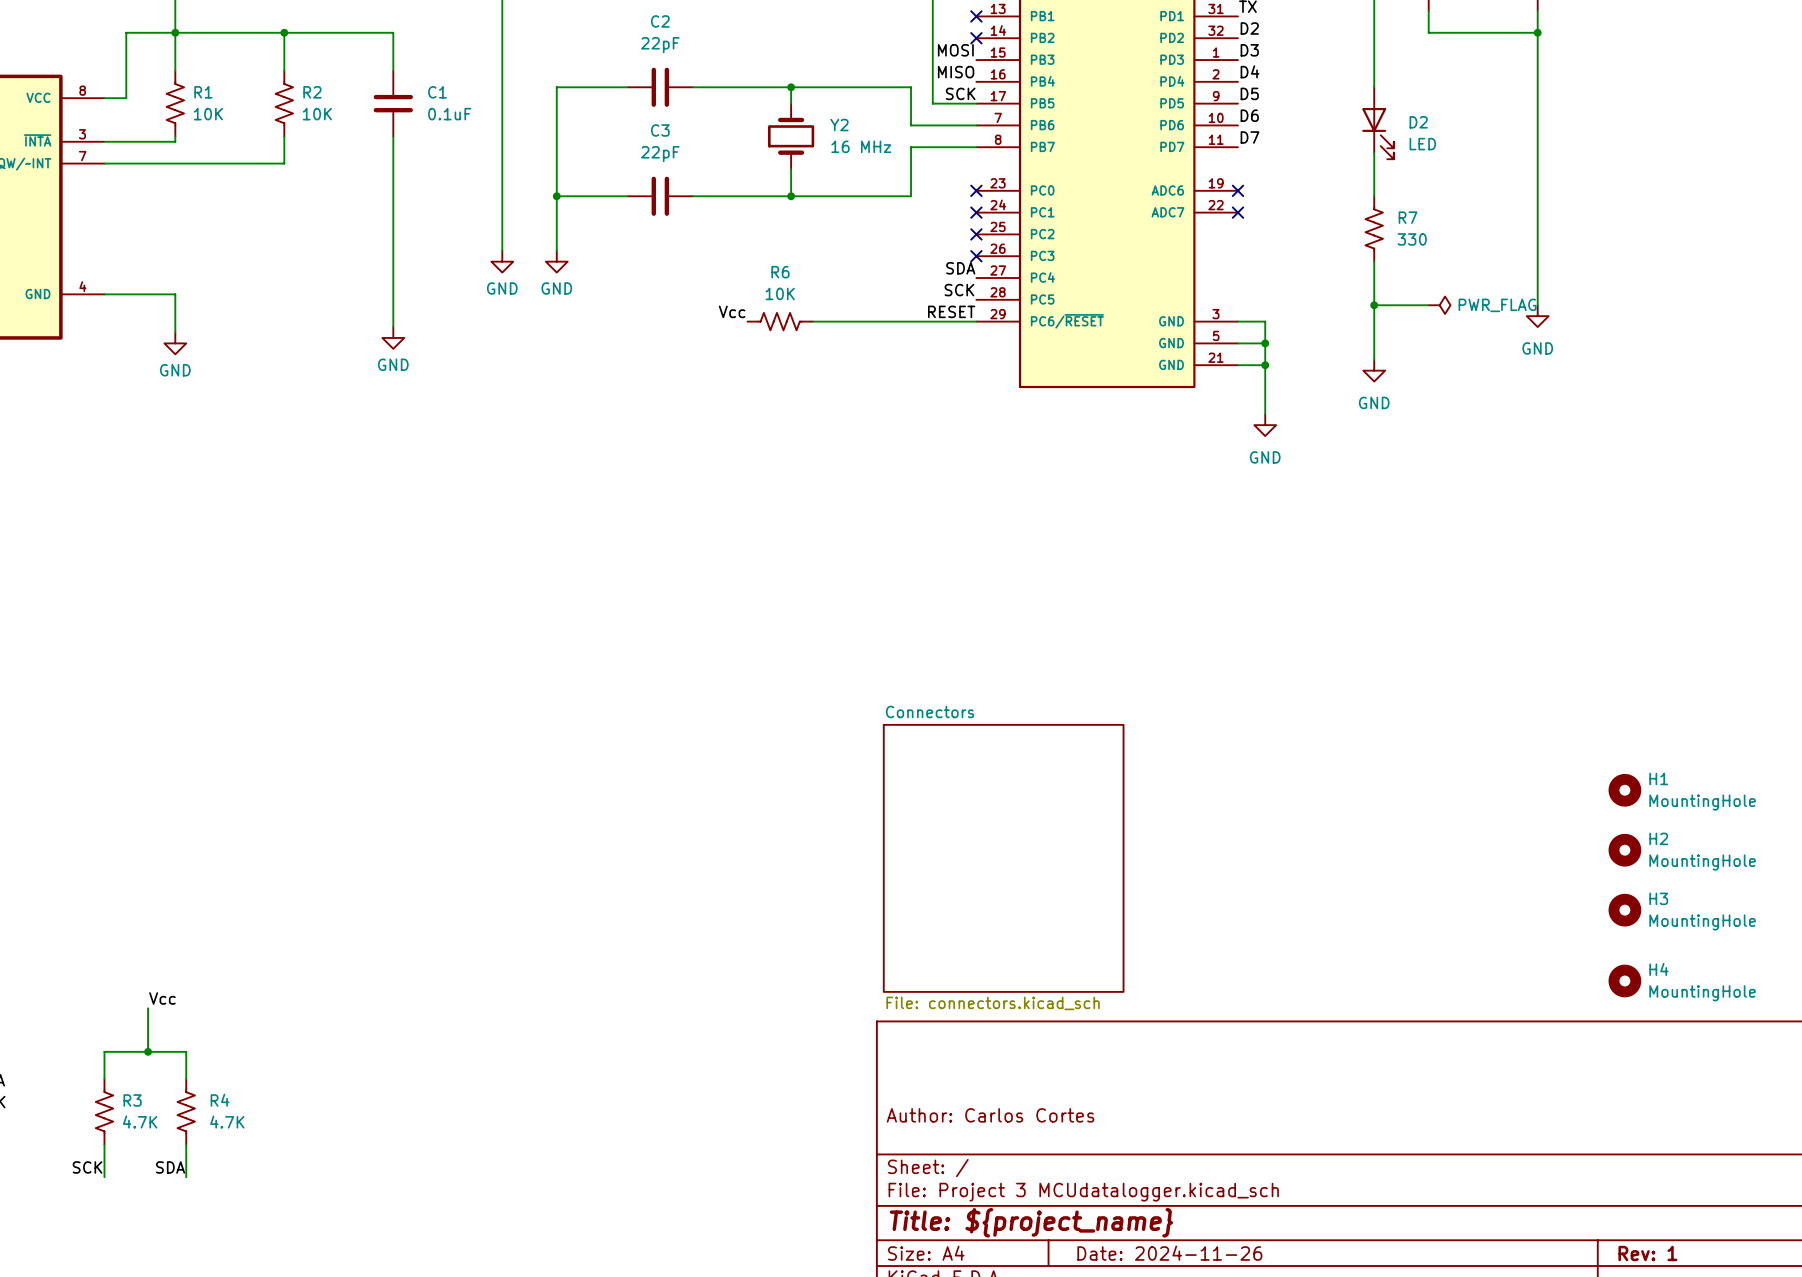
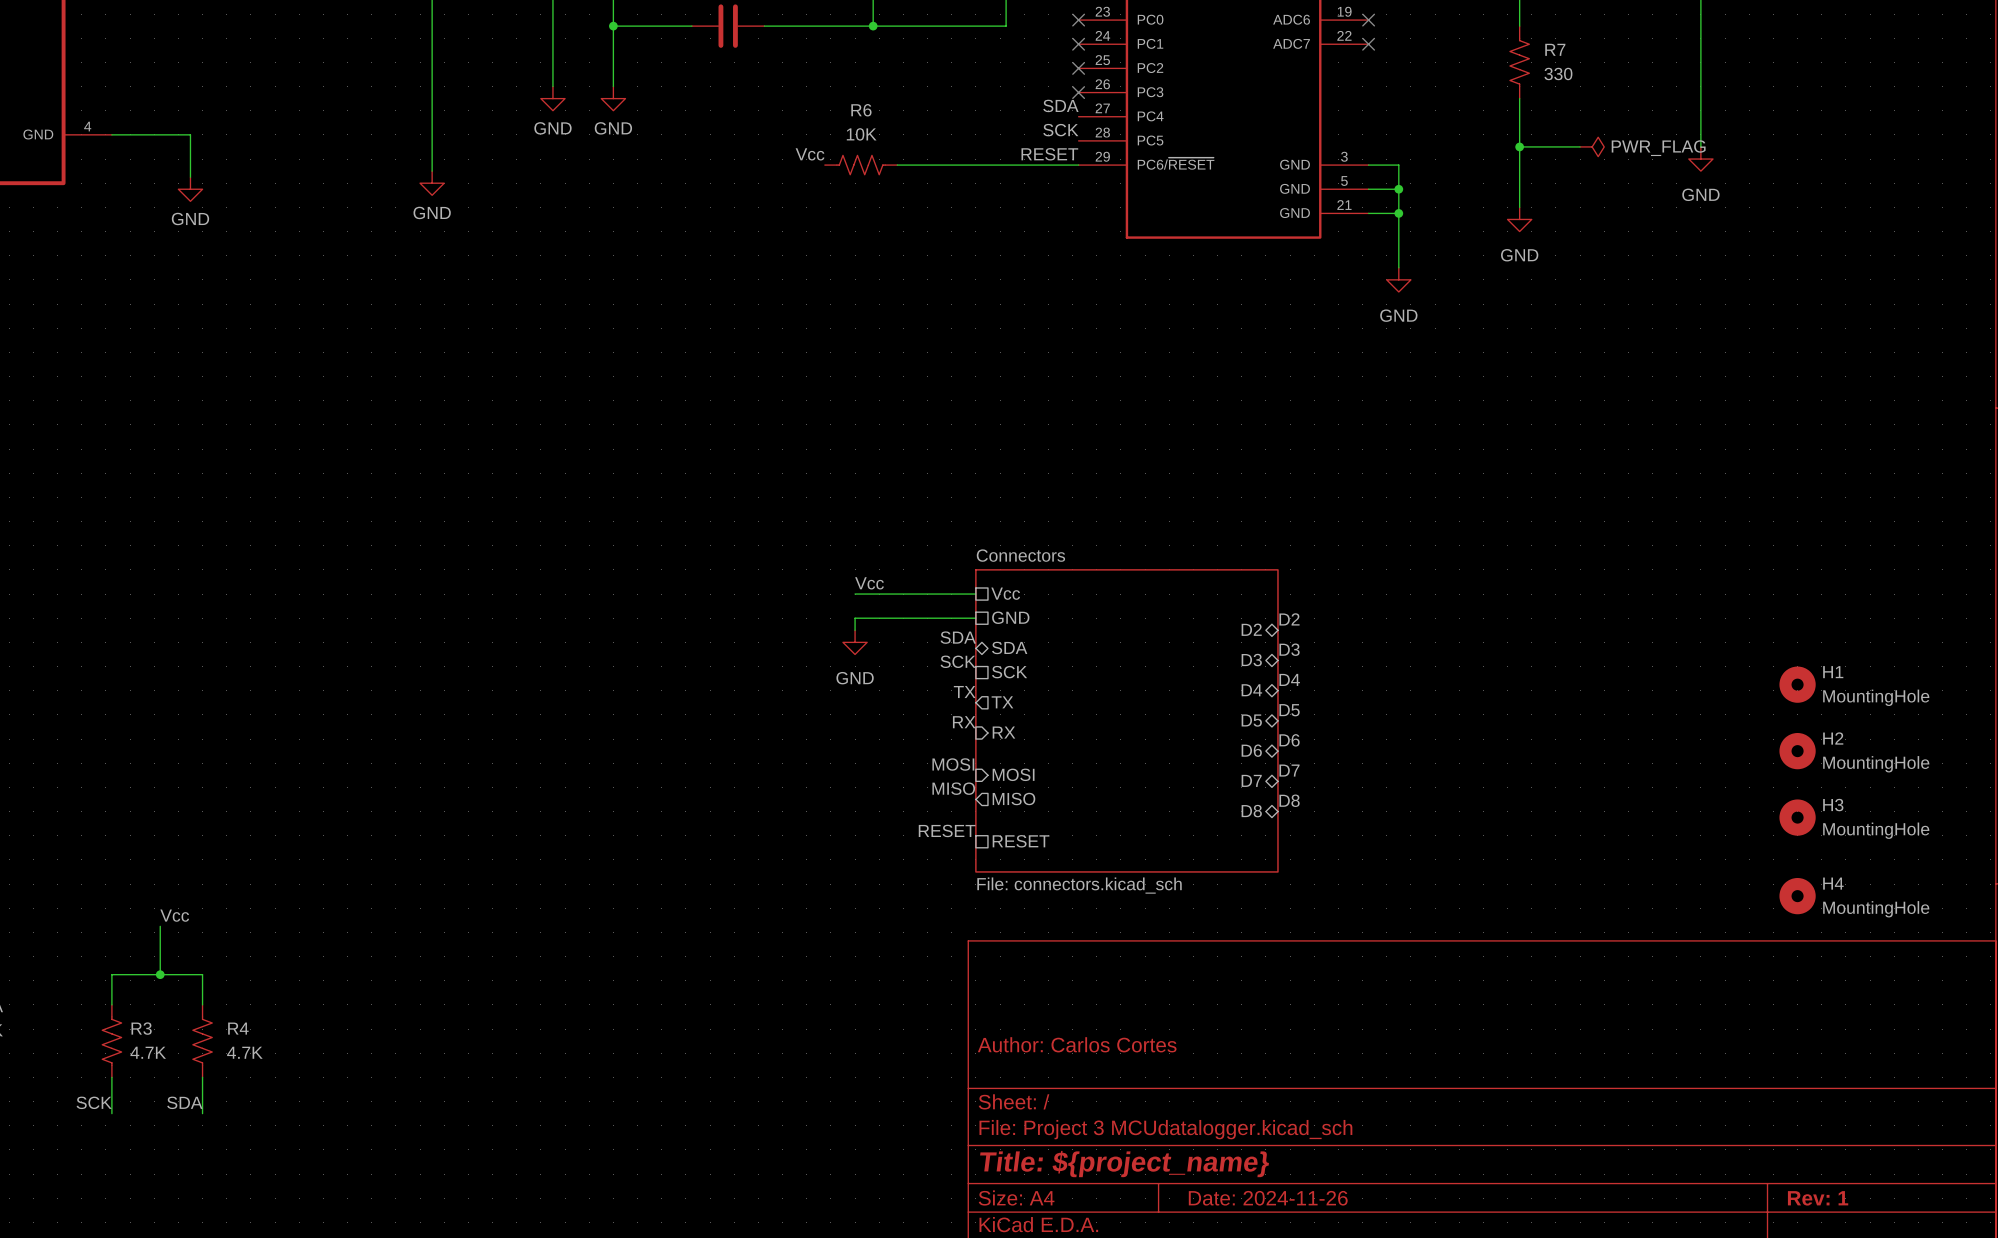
label: none -> Vcc (869, 583)
wire: none -> (855, 594) (975, 594)
sheet pin: none -> Vcc (1005, 593)
sheet pin: none -> GND (1010, 617)
wire: none -> (975, 618) (855, 618) (855, 630)
label: none -> D2 (1289, 619)
sheet pin: none -> D2 (1251, 629)
label: none -> SDA (958, 637)
power symbol: none -> GND (855, 642)
sheet pin: none -> SDA (1009, 647)
label: none -> D3 (1289, 649)
sheet pin: none -> D3 (1251, 660)
label: none -> SCK (958, 661)
sheet pin: none -> SCK (1009, 672)
label: none -> D4 (1289, 679)
sheet pin: none -> D4 (1251, 690)
label: none -> TX (964, 692)
sheet pin: none -> TX (1002, 702)
label: none -> D5 (1289, 710)
sheet Connectors: none -> File: connectors.kicad_sch (1126, 720)
sheet pin: none -> D5 (1251, 720)
label: none -> RX (964, 722)
sheet pin: none -> RX (1003, 732)
label: none -> D6 (1289, 740)
sheet pin: none -> D6 (1251, 750)
sheet Connectors: File: connectors.kicad_sch (1003, 858) -> none
label: none -> MOSI (953, 764)
label: none -> D7 (1289, 770)
sheet pin: none -> MOSI (1013, 774)
sheet pin: none -> D7 (1251, 780)
label: none -> MISO (953, 788)
sheet pin: none -> MISO (1013, 799)
label: none -> D8 (1289, 800)
sheet pin: none -> D8 (1251, 811)
label: none -> RESET (947, 830)
sheet pin: none -> RESET (1021, 841)

